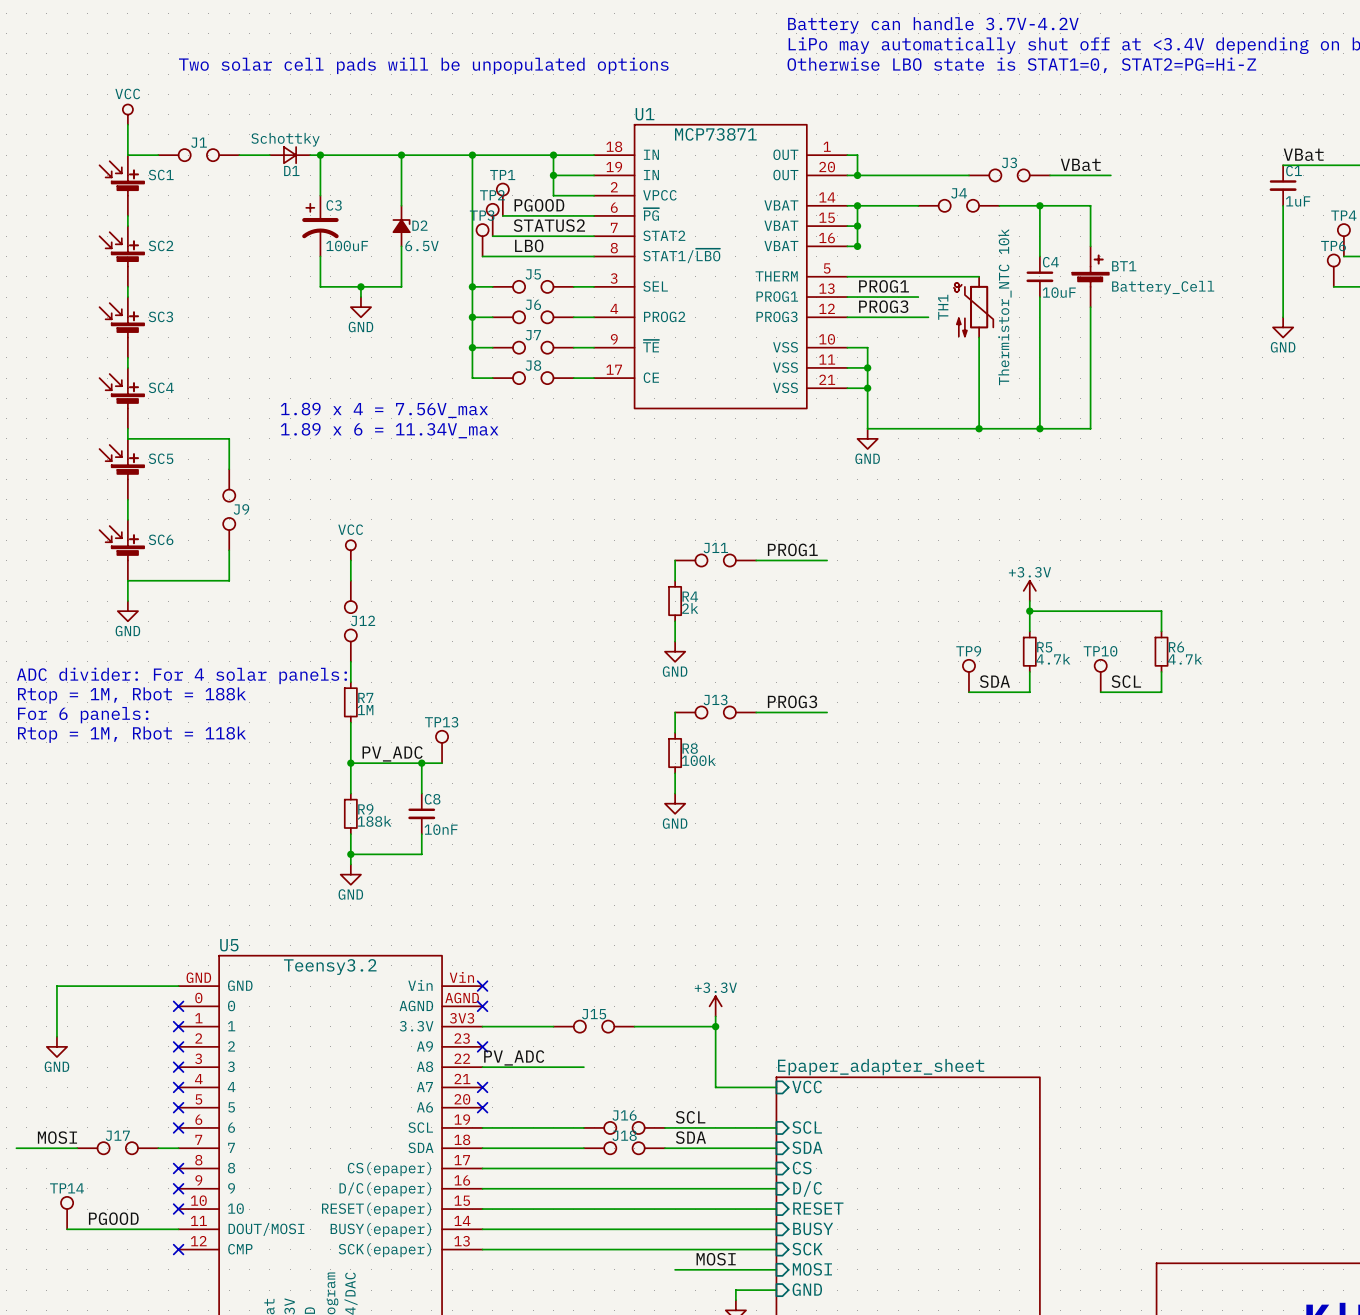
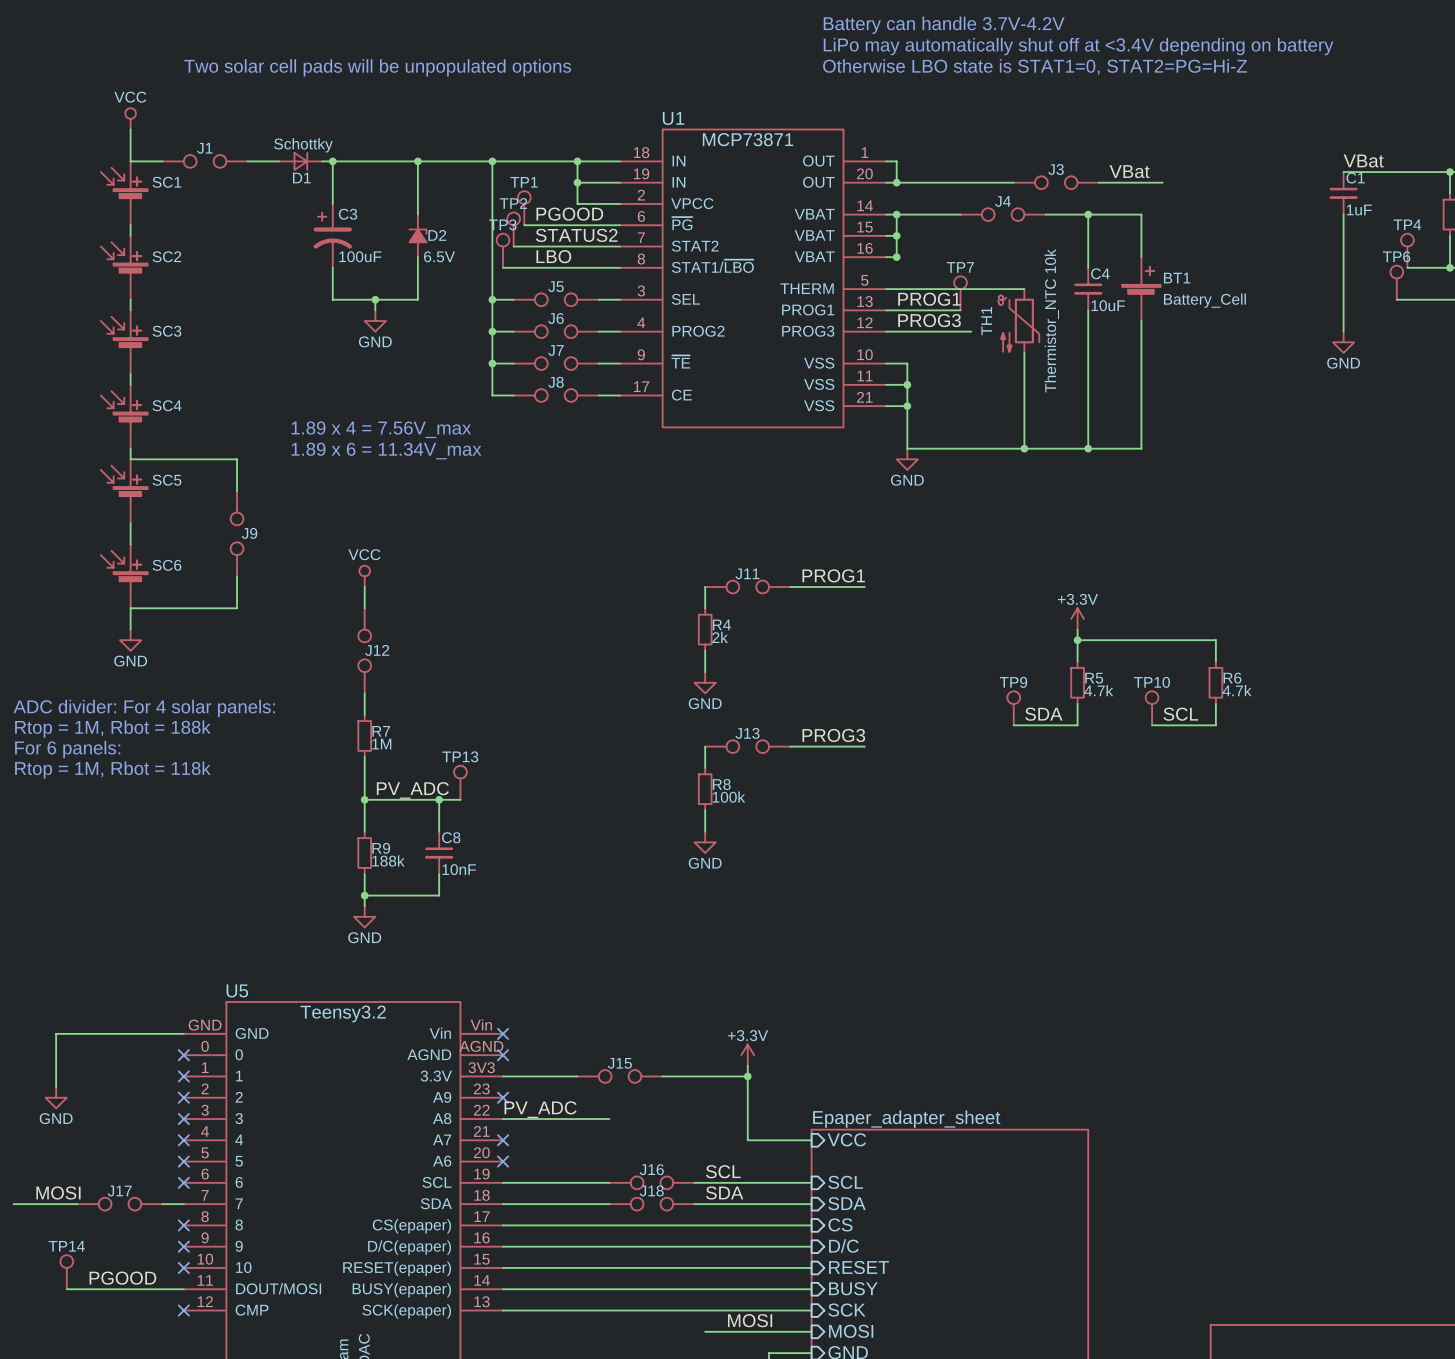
TP7: none -> (960, 293)

